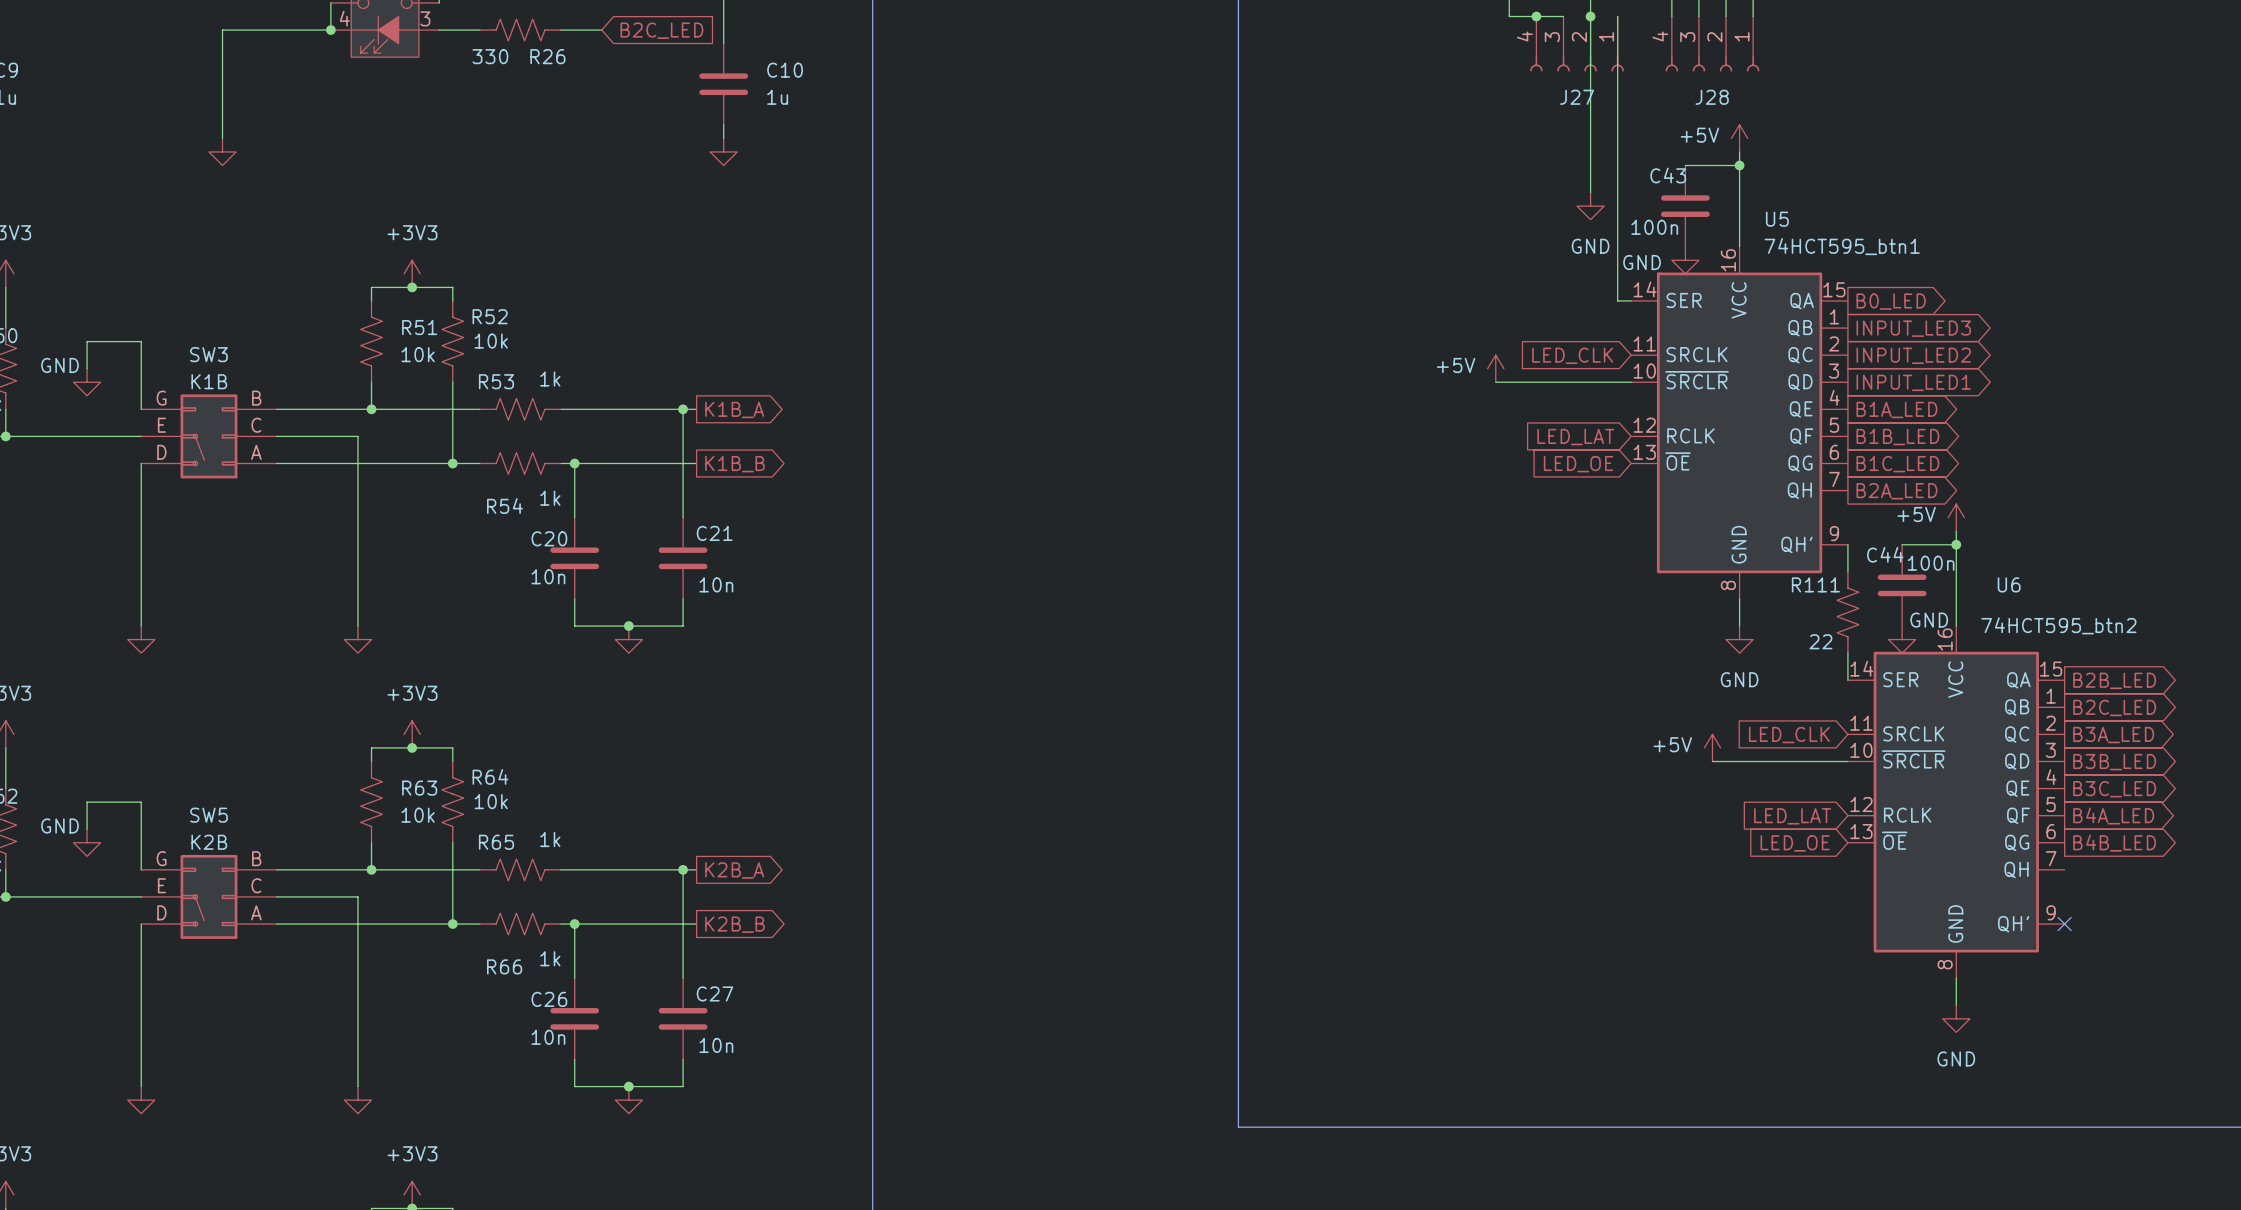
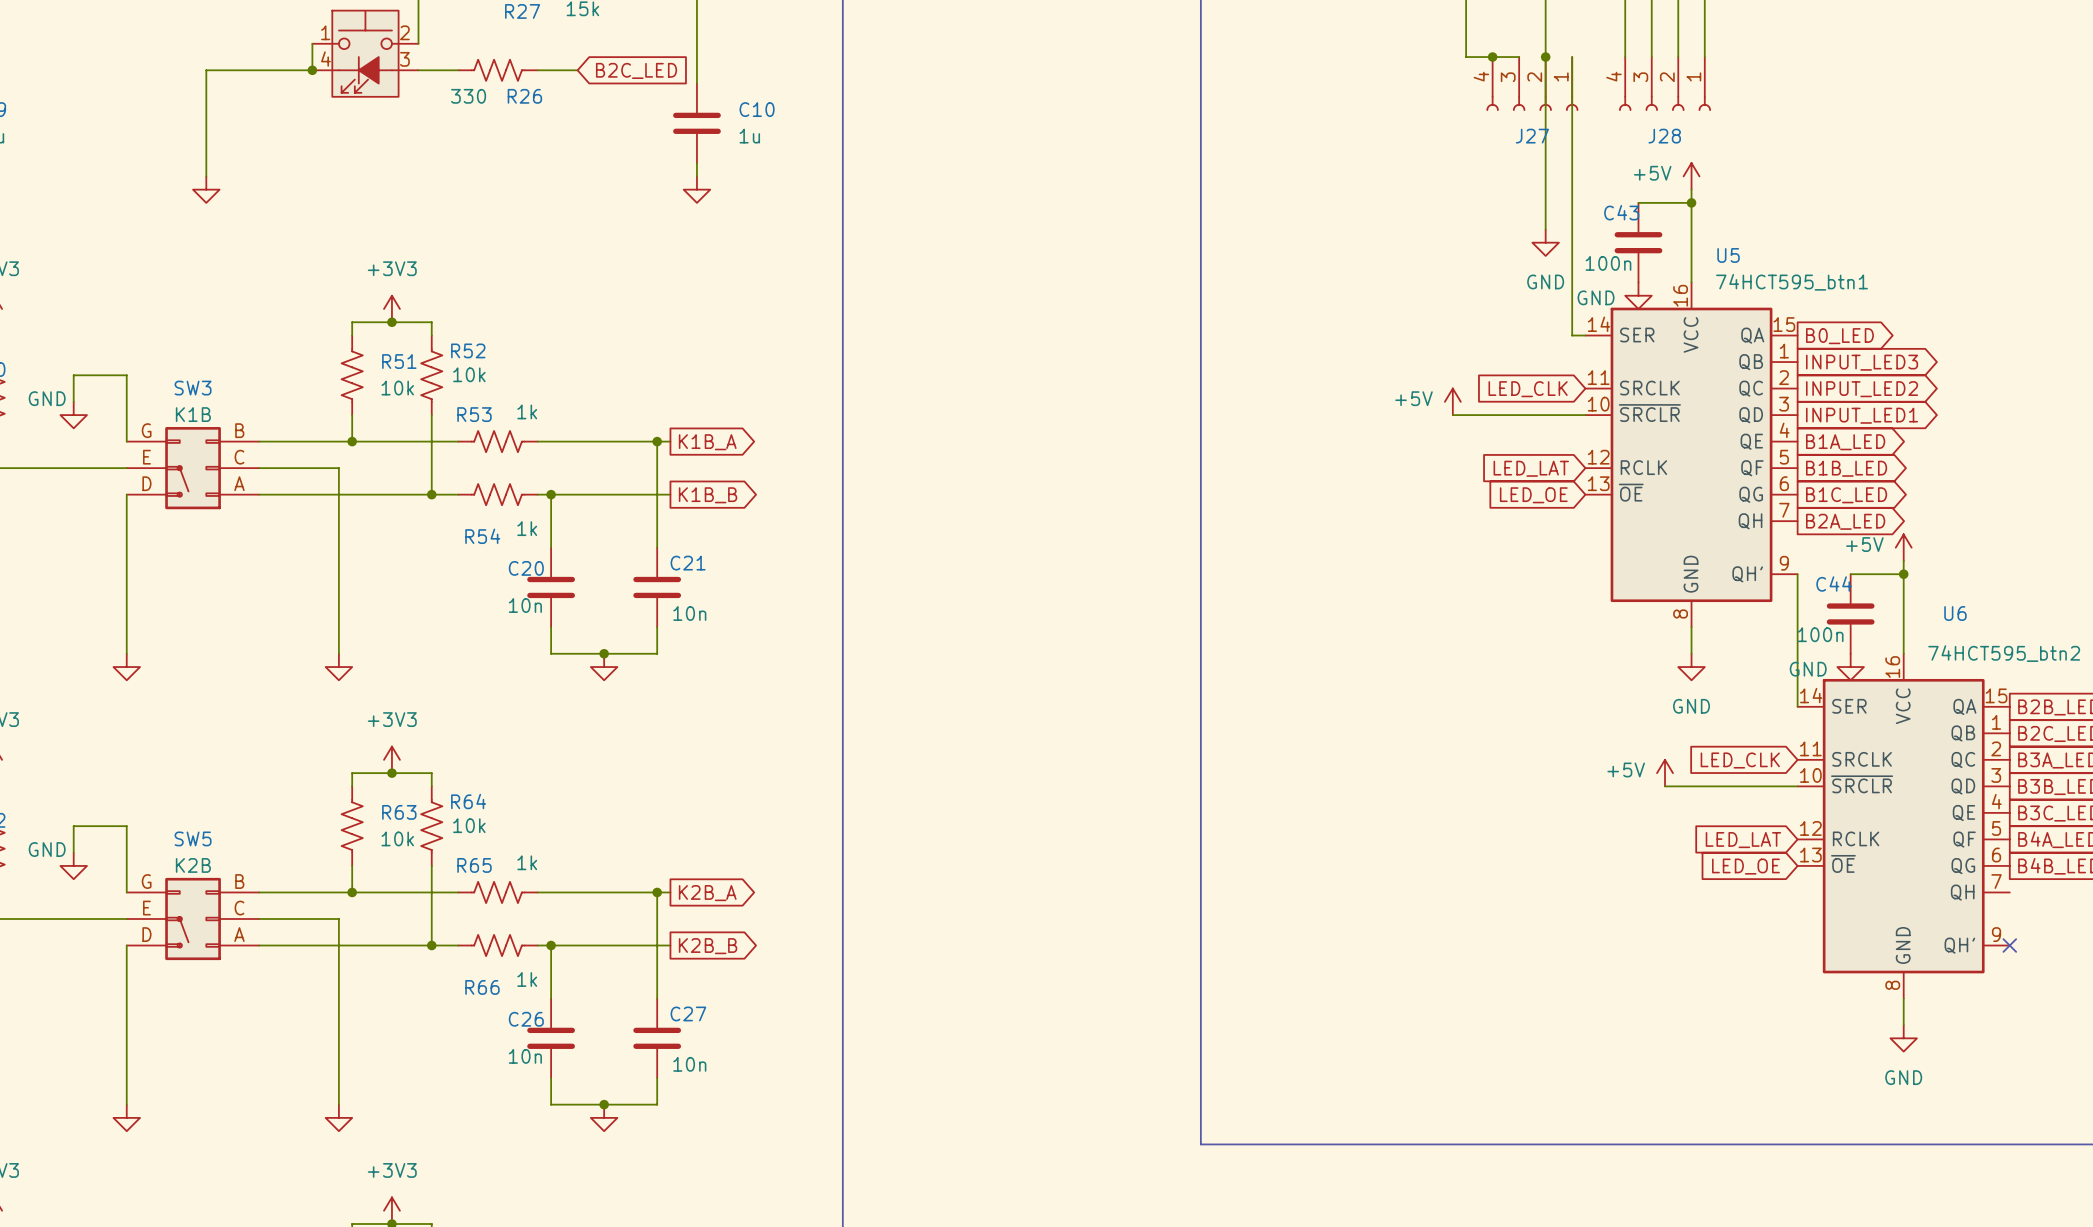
C44 value position: 100n (1931, 563) -> 100n (1820, 634)
R111: 22 (1847, 612) -> none
power symbol text position: GND (1929, 620) -> GND (1808, 669)

